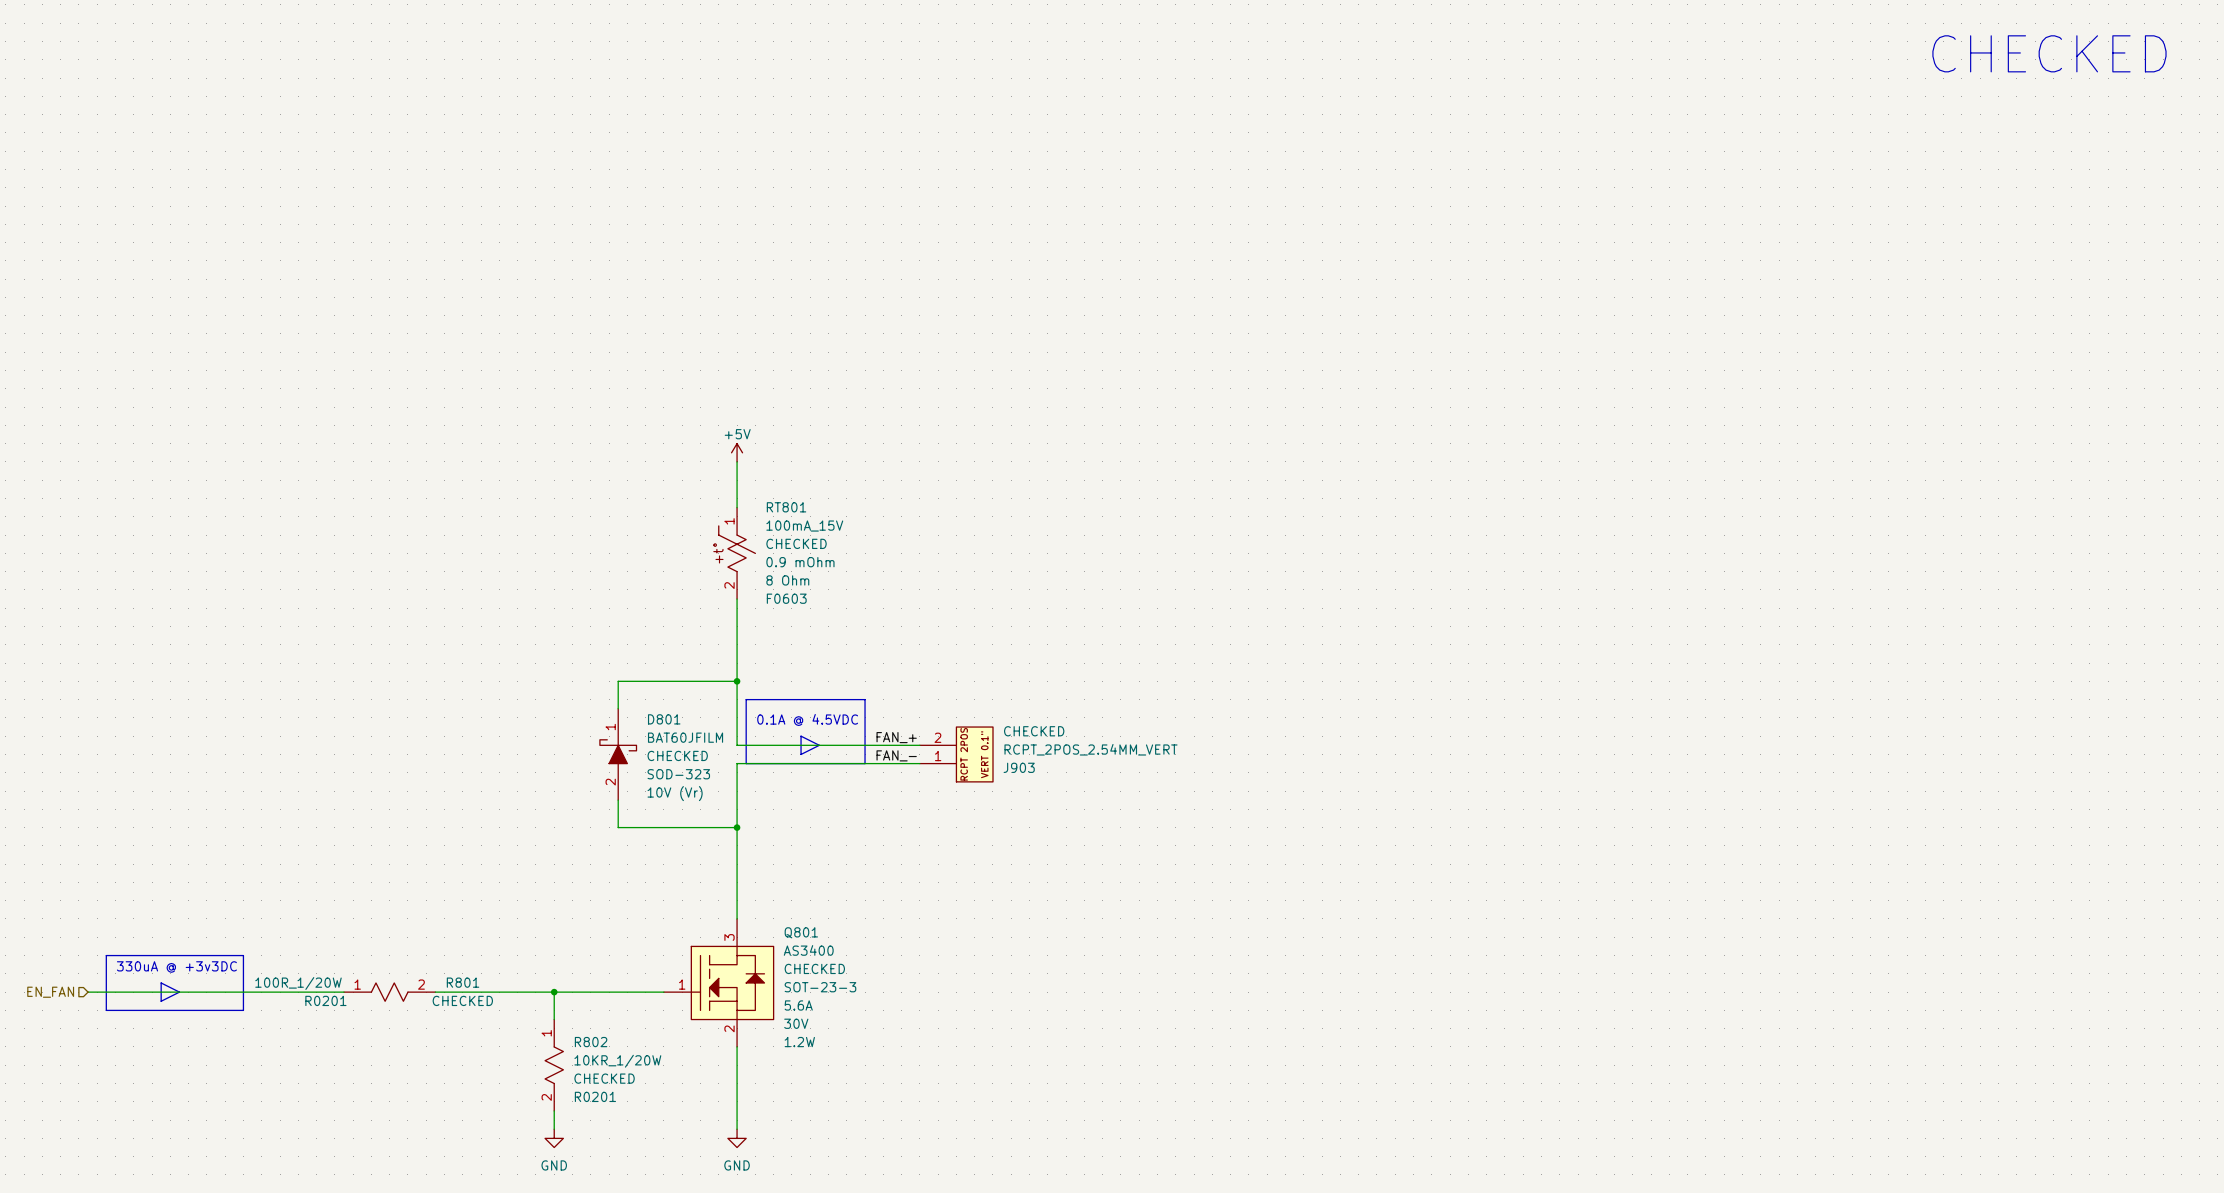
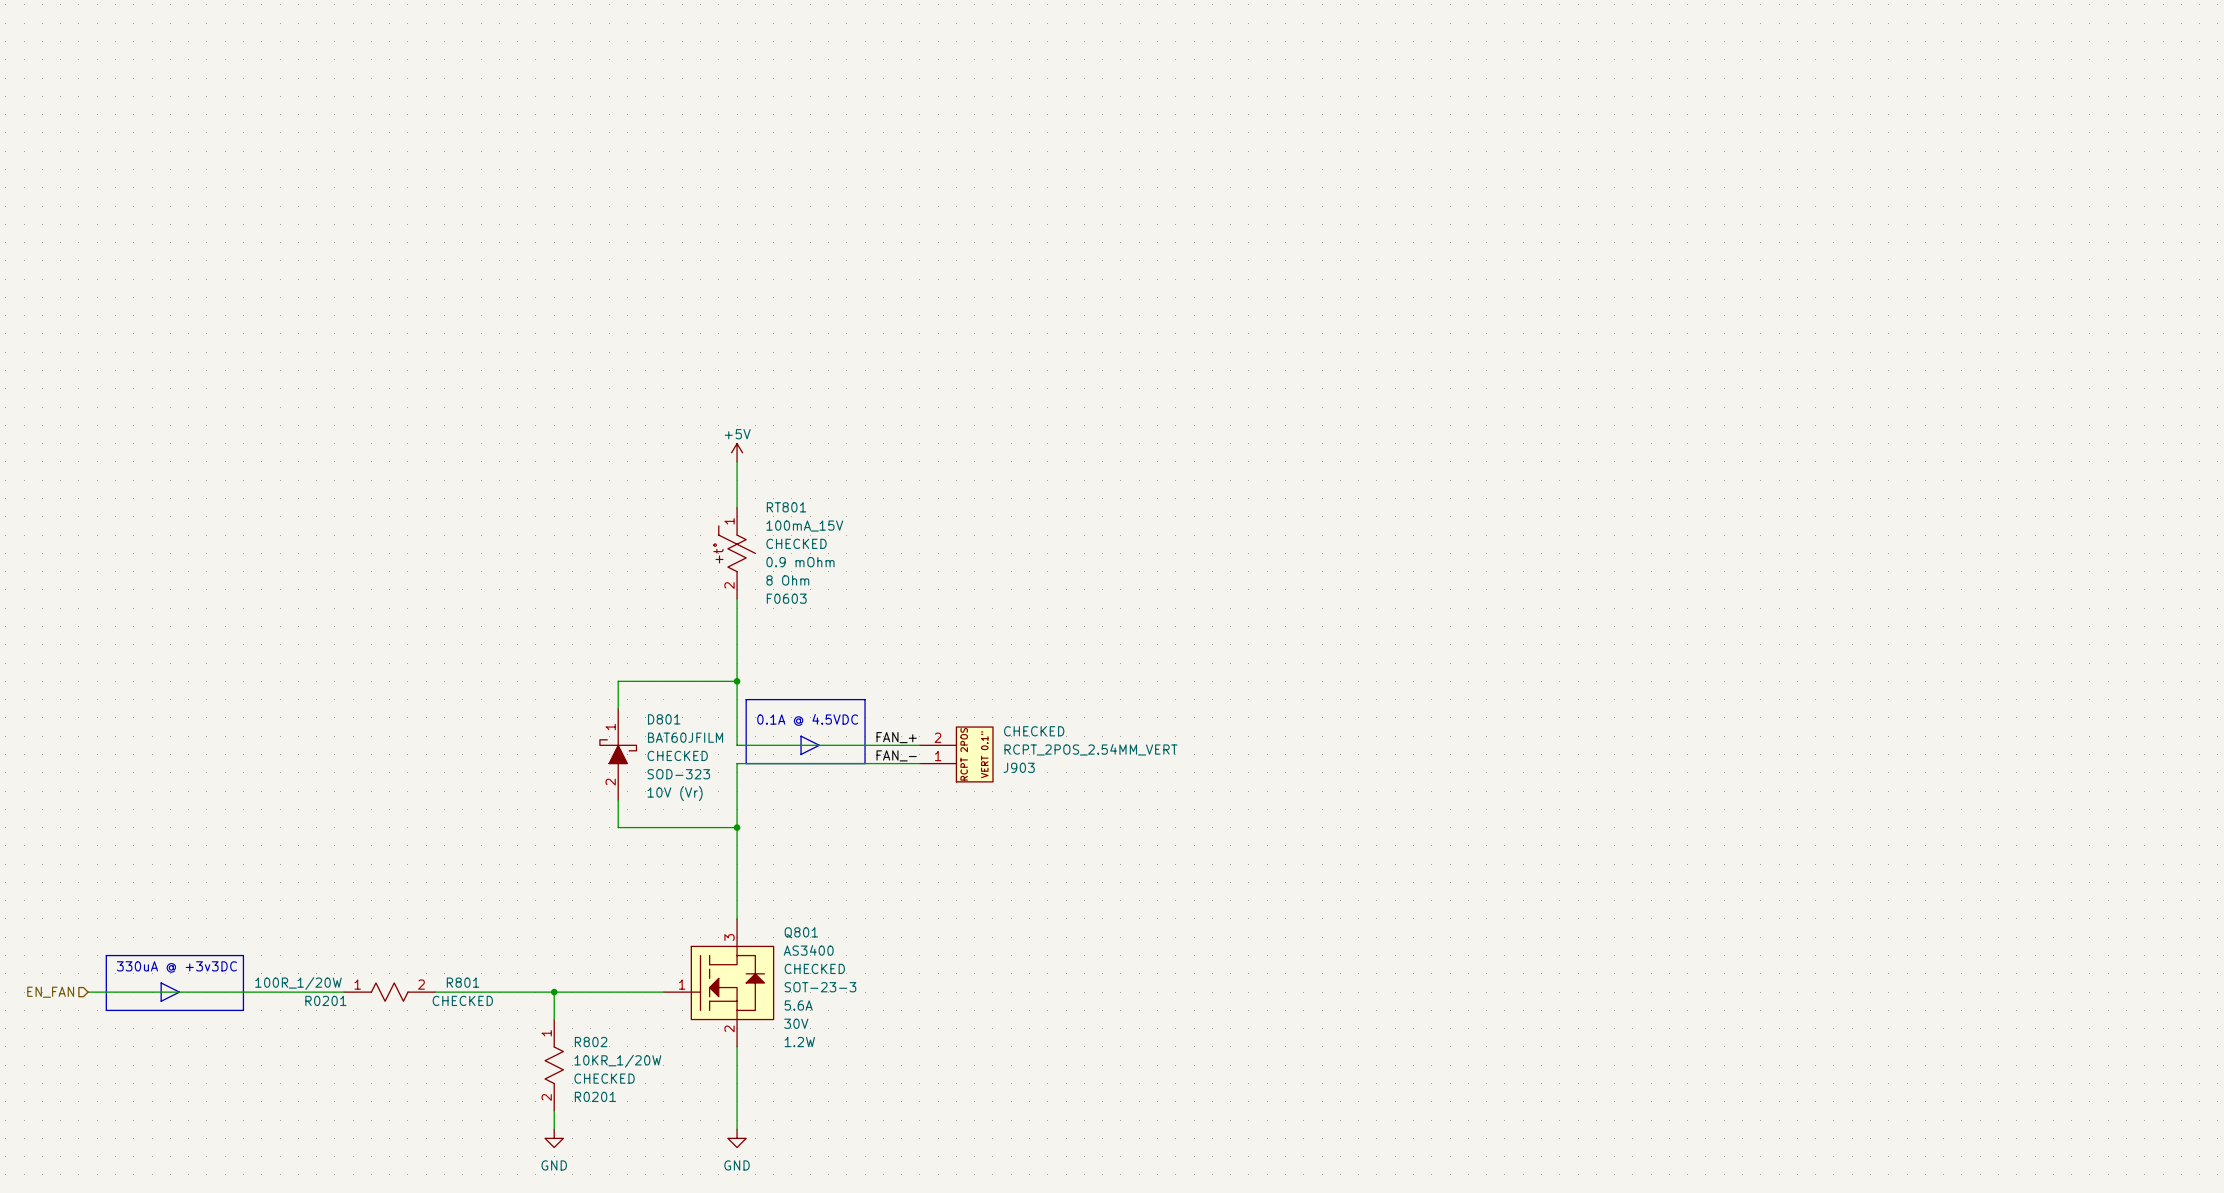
text: CHECKED (2049, 53) -> none

